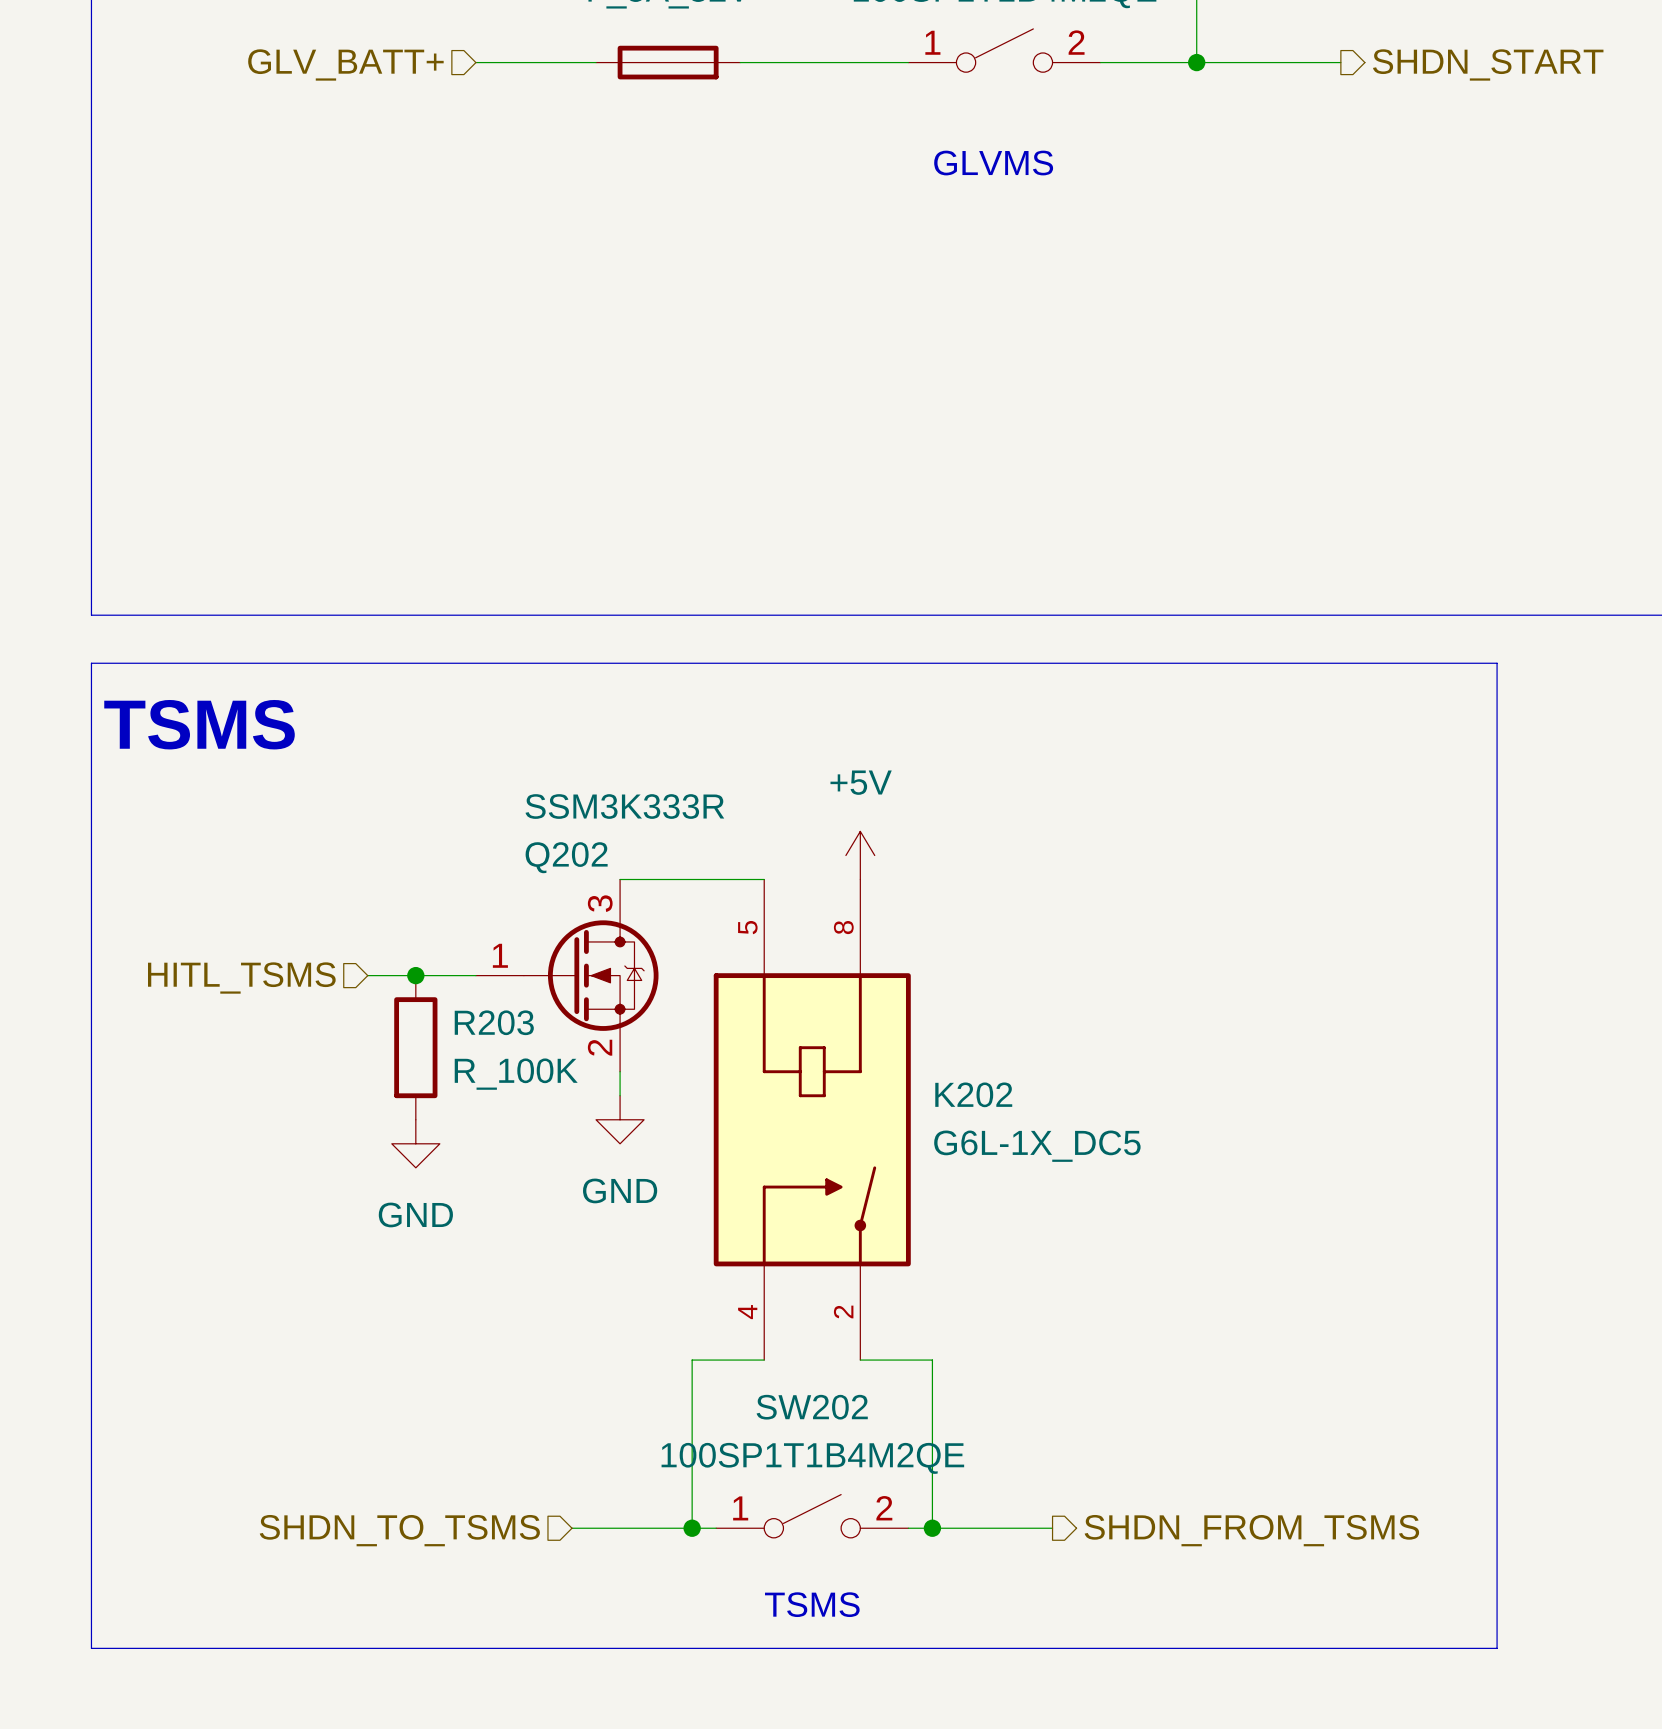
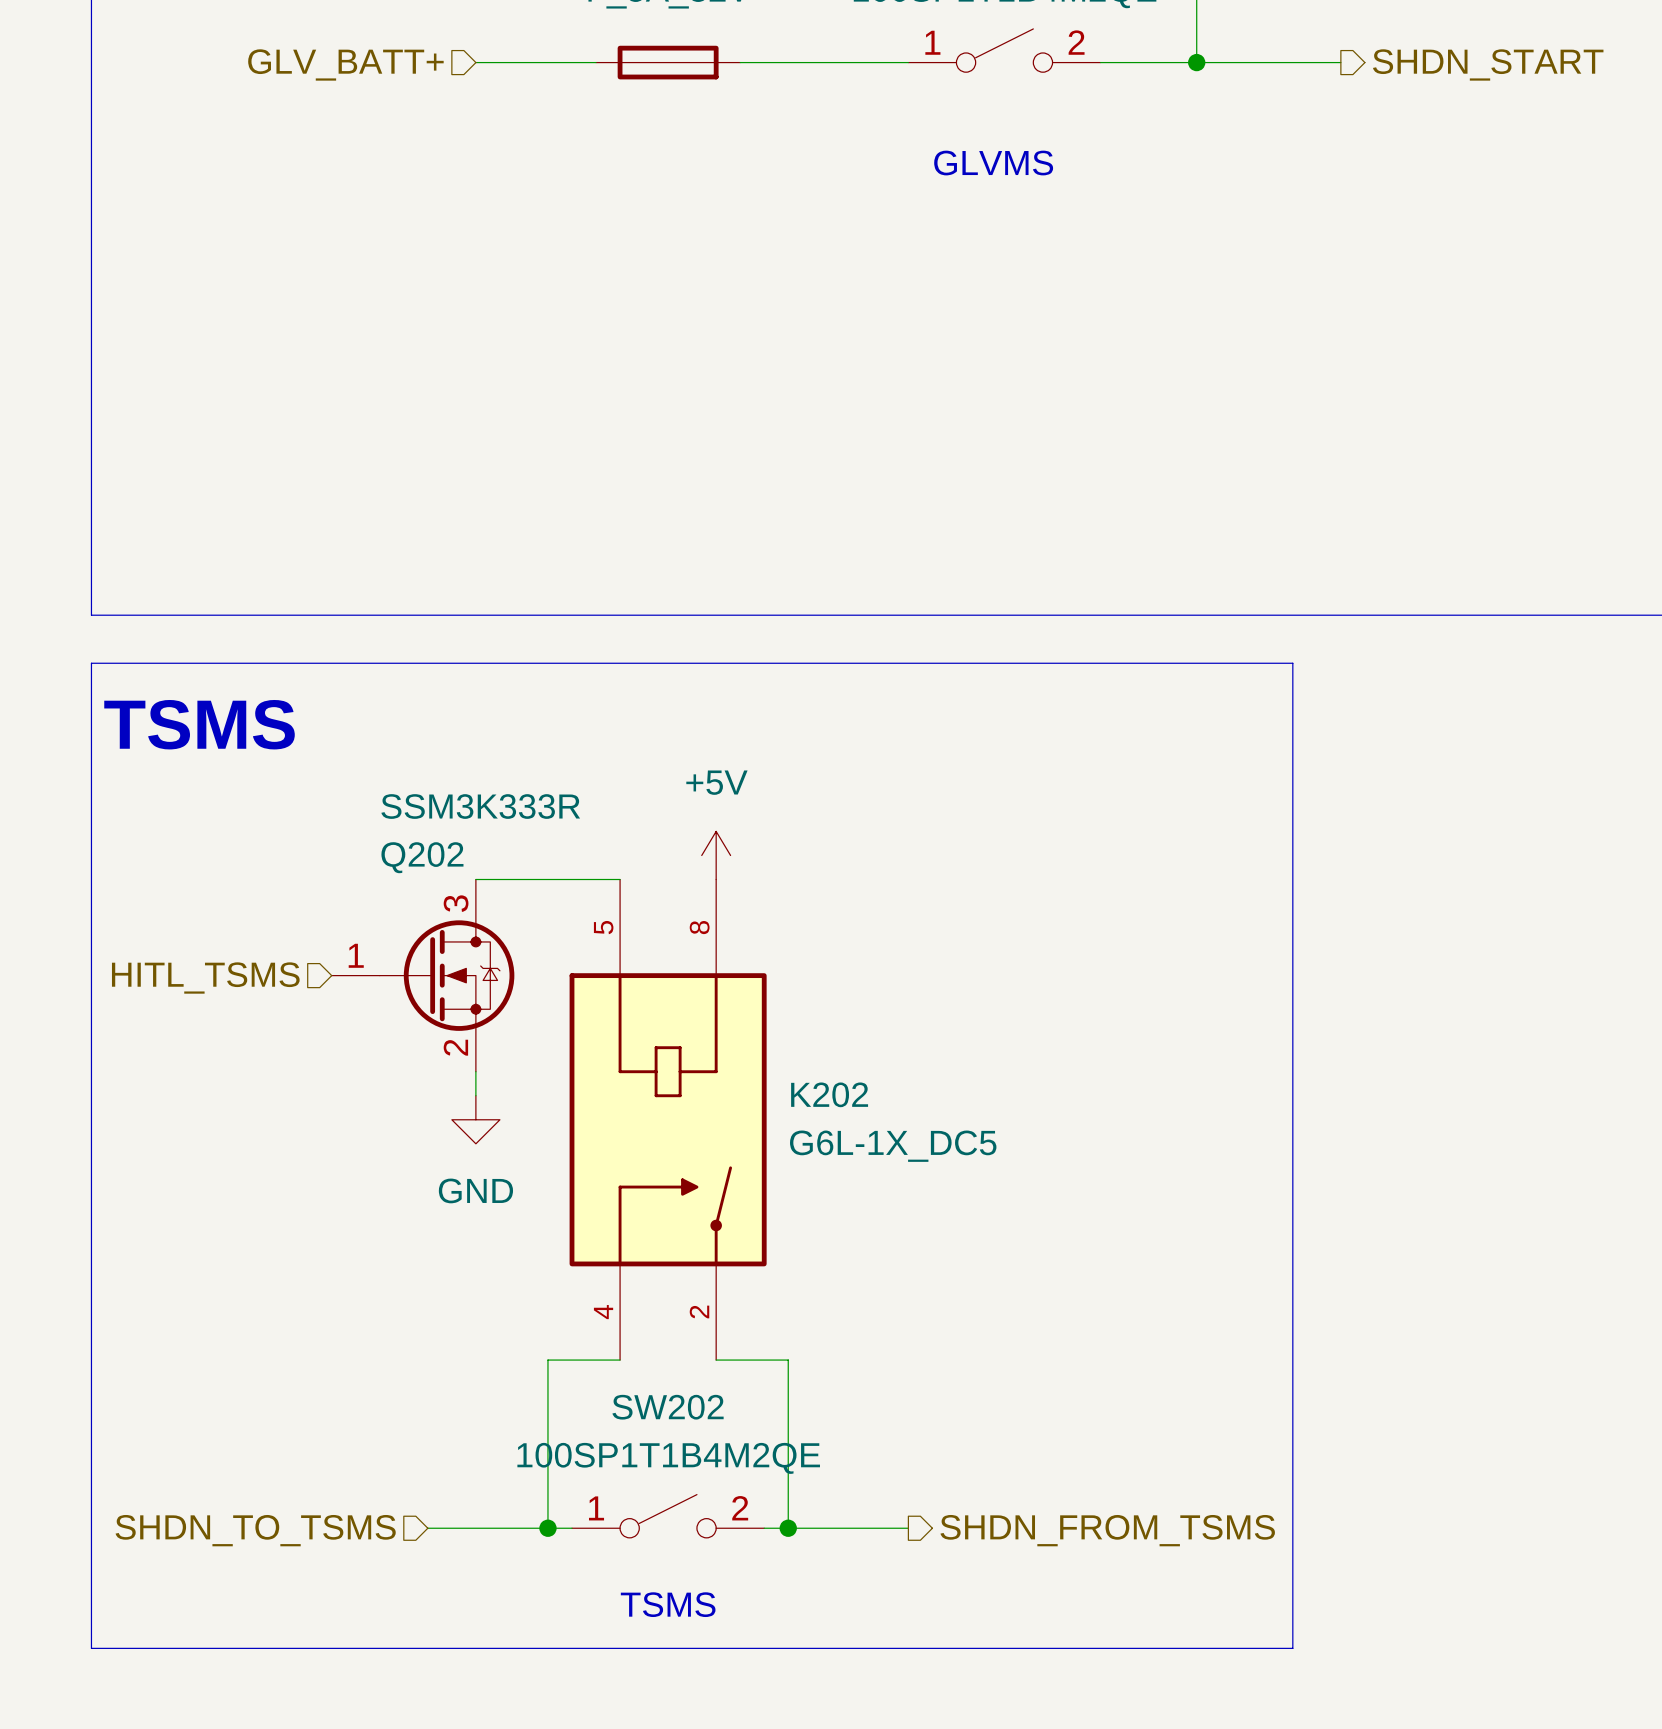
line: (1292, 663) (1497, 663) (1497, 1648) (1292, 1648) -> (1292, 663) (1292, 1648)
power symbol position: +5V (860, 855) -> +5V (716, 855)
wire: (620, 879) (764, 879) -> (620, 879) (475, 879)
junction: (415, 975) -> none
Q202 position: (567, 975) -> (423, 975)
hierarchical label position: HITL_TSMS (241, 978) -> HITL_TSMS (205, 978)
R203: R_100K (415, 1047) -> none
power symbol: GND (620, 1119) -> none
K202 position: (812, 1119) -> (668, 1119)
power symbol position: GND (415, 1143) -> GND (475, 1119)
wire: none -> (620, 1360) (547, 1360) (547, 1528)
wire: (716, 1360) (692, 1360) (692, 1528) -> none
wire: none -> (764, 1360) (788, 1360) (788, 1528)
wire: (860, 1360) (932, 1360) (932, 1528) -> none
SW202 position: (812, 1516) -> (668, 1516)
junction: none -> (547, 1528)
wire: (572, 1528) (716, 1528) -> (572, 1528) (427, 1528)
junction: (692, 1528) -> none
junction: none -> (788, 1528)
wire: (908, 1528) (1052, 1528) -> (908, 1528) (764, 1528)
junction: (932, 1528) -> none
hierarchical label position: SHDN_TO_TSMS (399, 1530) -> SHDN_TO_TSMS (255, 1530)
hierarchical label position: SHDN_FROM_TSMS (1251, 1530) -> SHDN_FROM_TSMS (1107, 1530)
text position: TSMS (812, 1604) -> TSMS (668, 1604)

